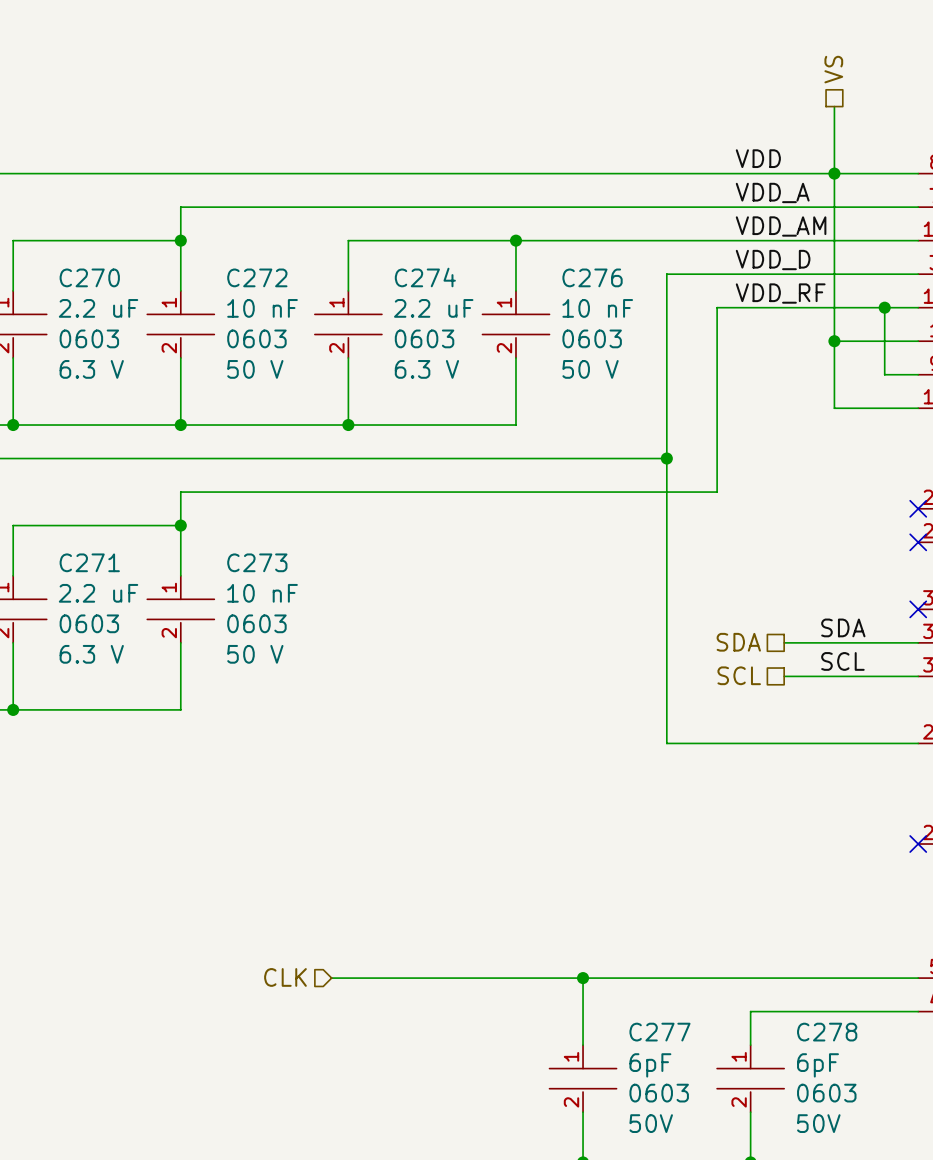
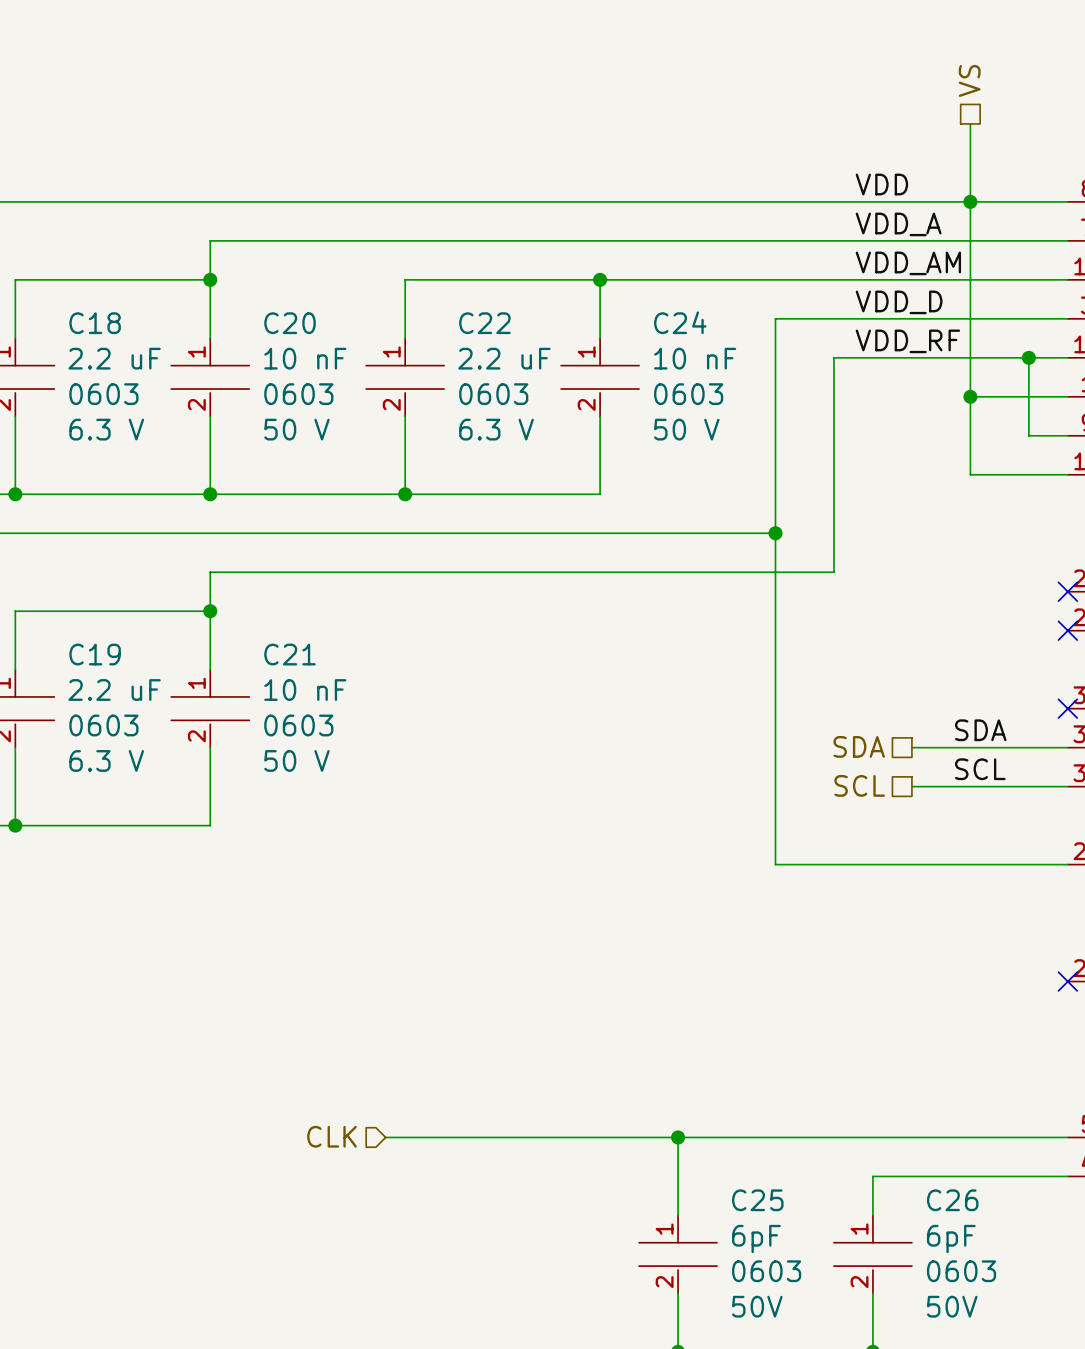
C270 name: C270 (89, 277) -> C18 (95, 323)
C272 name: C272 (257, 277) -> C20 (290, 323)
C274 name: C274 (425, 277) -> C22 (484, 323)
C276 name: C276 (592, 277) -> C24 (680, 322)
C271 name: C271 (89, 562) -> C19 (95, 654)
C273 name: C273 (257, 562) -> C21 (290, 654)
C277 name: C277 (659, 1032) -> C25 (757, 1200)
C278 name: C278 (827, 1032) -> C26 (952, 1200)

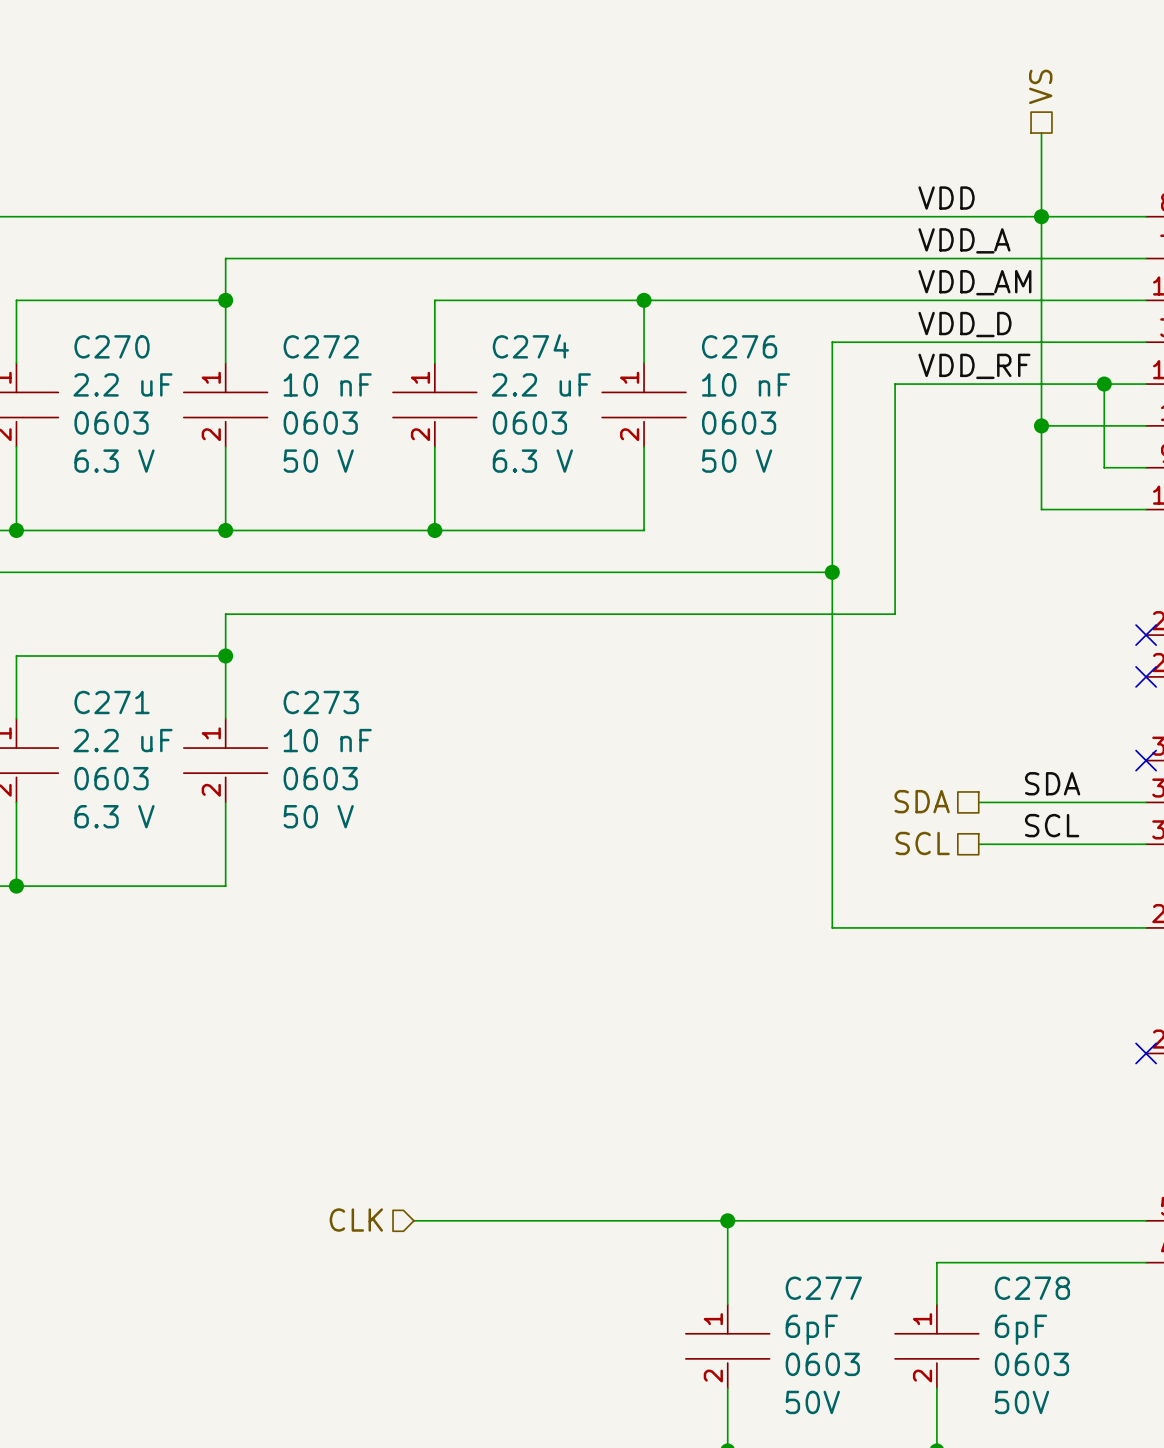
C24 name: C24 (680, 322) -> C276 (739, 346)
C18 name: C18 (95, 323) -> C270 (112, 346)
C20 name: C20 (290, 323) -> C272 (321, 346)
C22 name: C22 (484, 323) -> C274 (530, 346)
C19 name: C19 (95, 654) -> C271 (112, 702)
C21 name: C21 (290, 654) -> C273 (321, 702)
C25 name: C25 (757, 1200) -> C277 (823, 1288)
C26 name: C26 (952, 1200) -> C278 (1032, 1288)

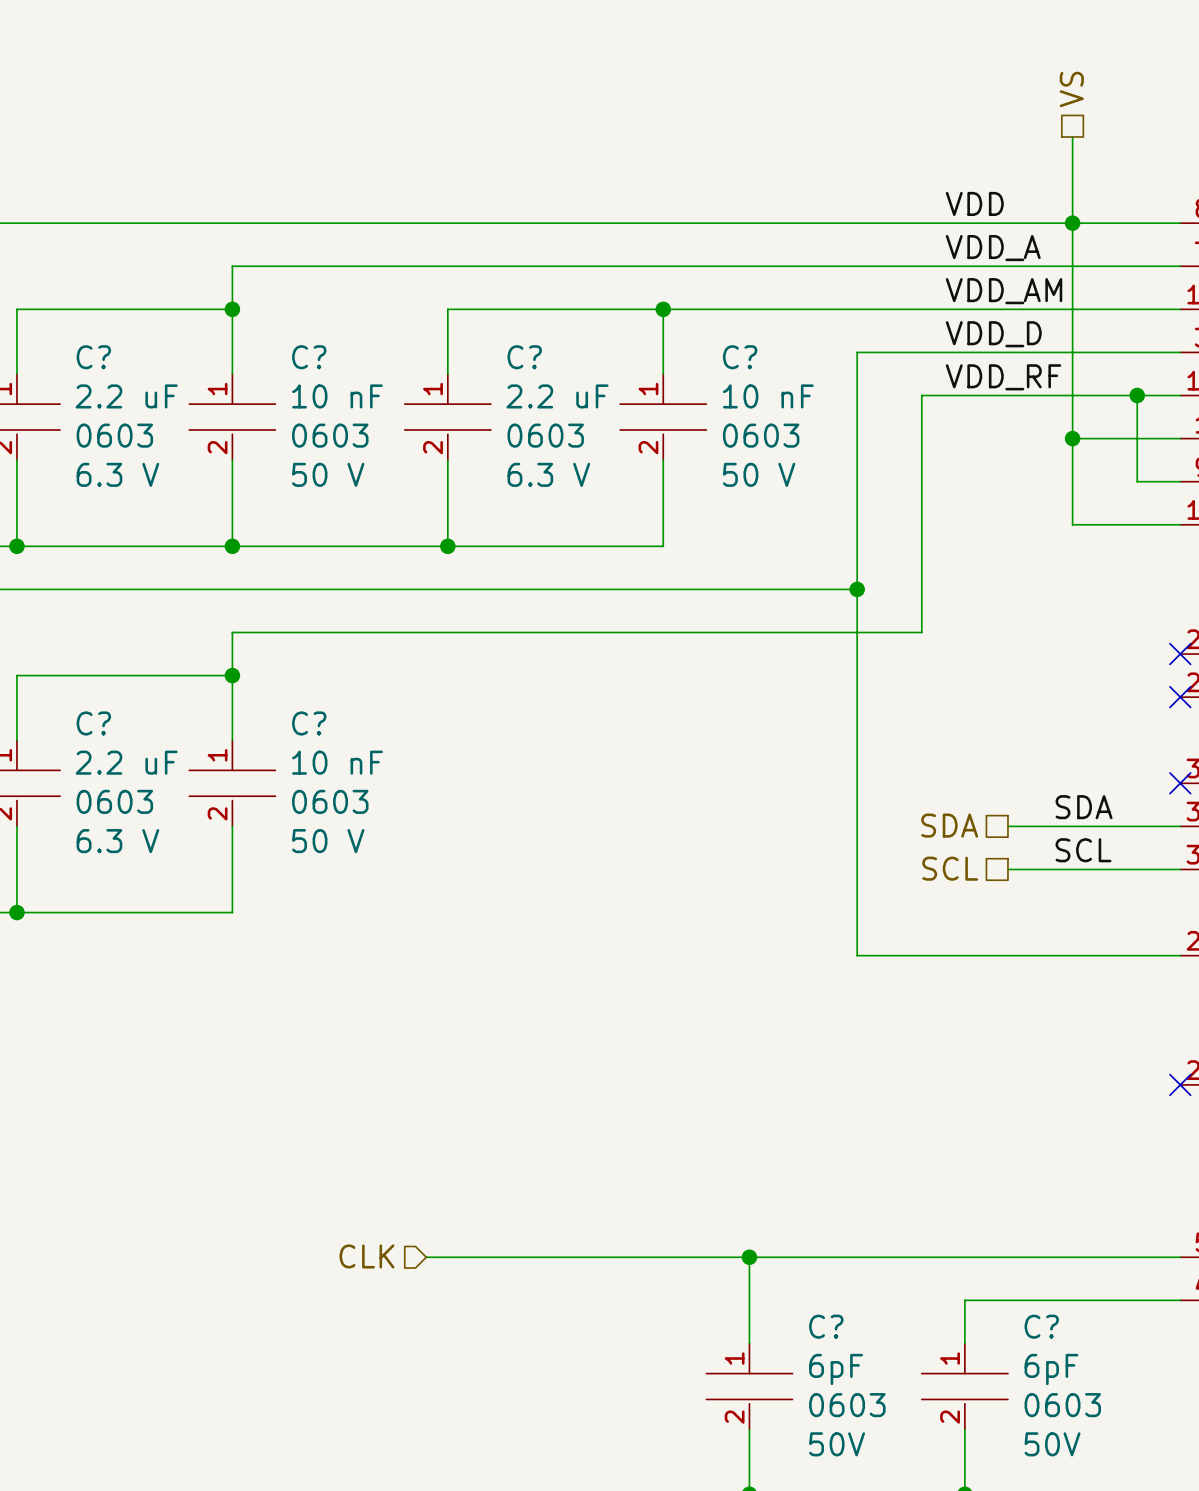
C270 name: C270 (112, 346) -> C? (93, 357)
C272 name: C272 (321, 346) -> C? (309, 357)
C274 name: C274 (530, 346) -> C? (524, 357)
C276 name: C276 (739, 346) -> C? (740, 357)
C271 name: C271 (112, 702) -> C? (93, 723)
C273 name: C273 (321, 702) -> C? (309, 723)
C277 name: C277 (823, 1288) -> C? (826, 1326)
C278 name: C278 (1032, 1288) -> C? (1041, 1326)

